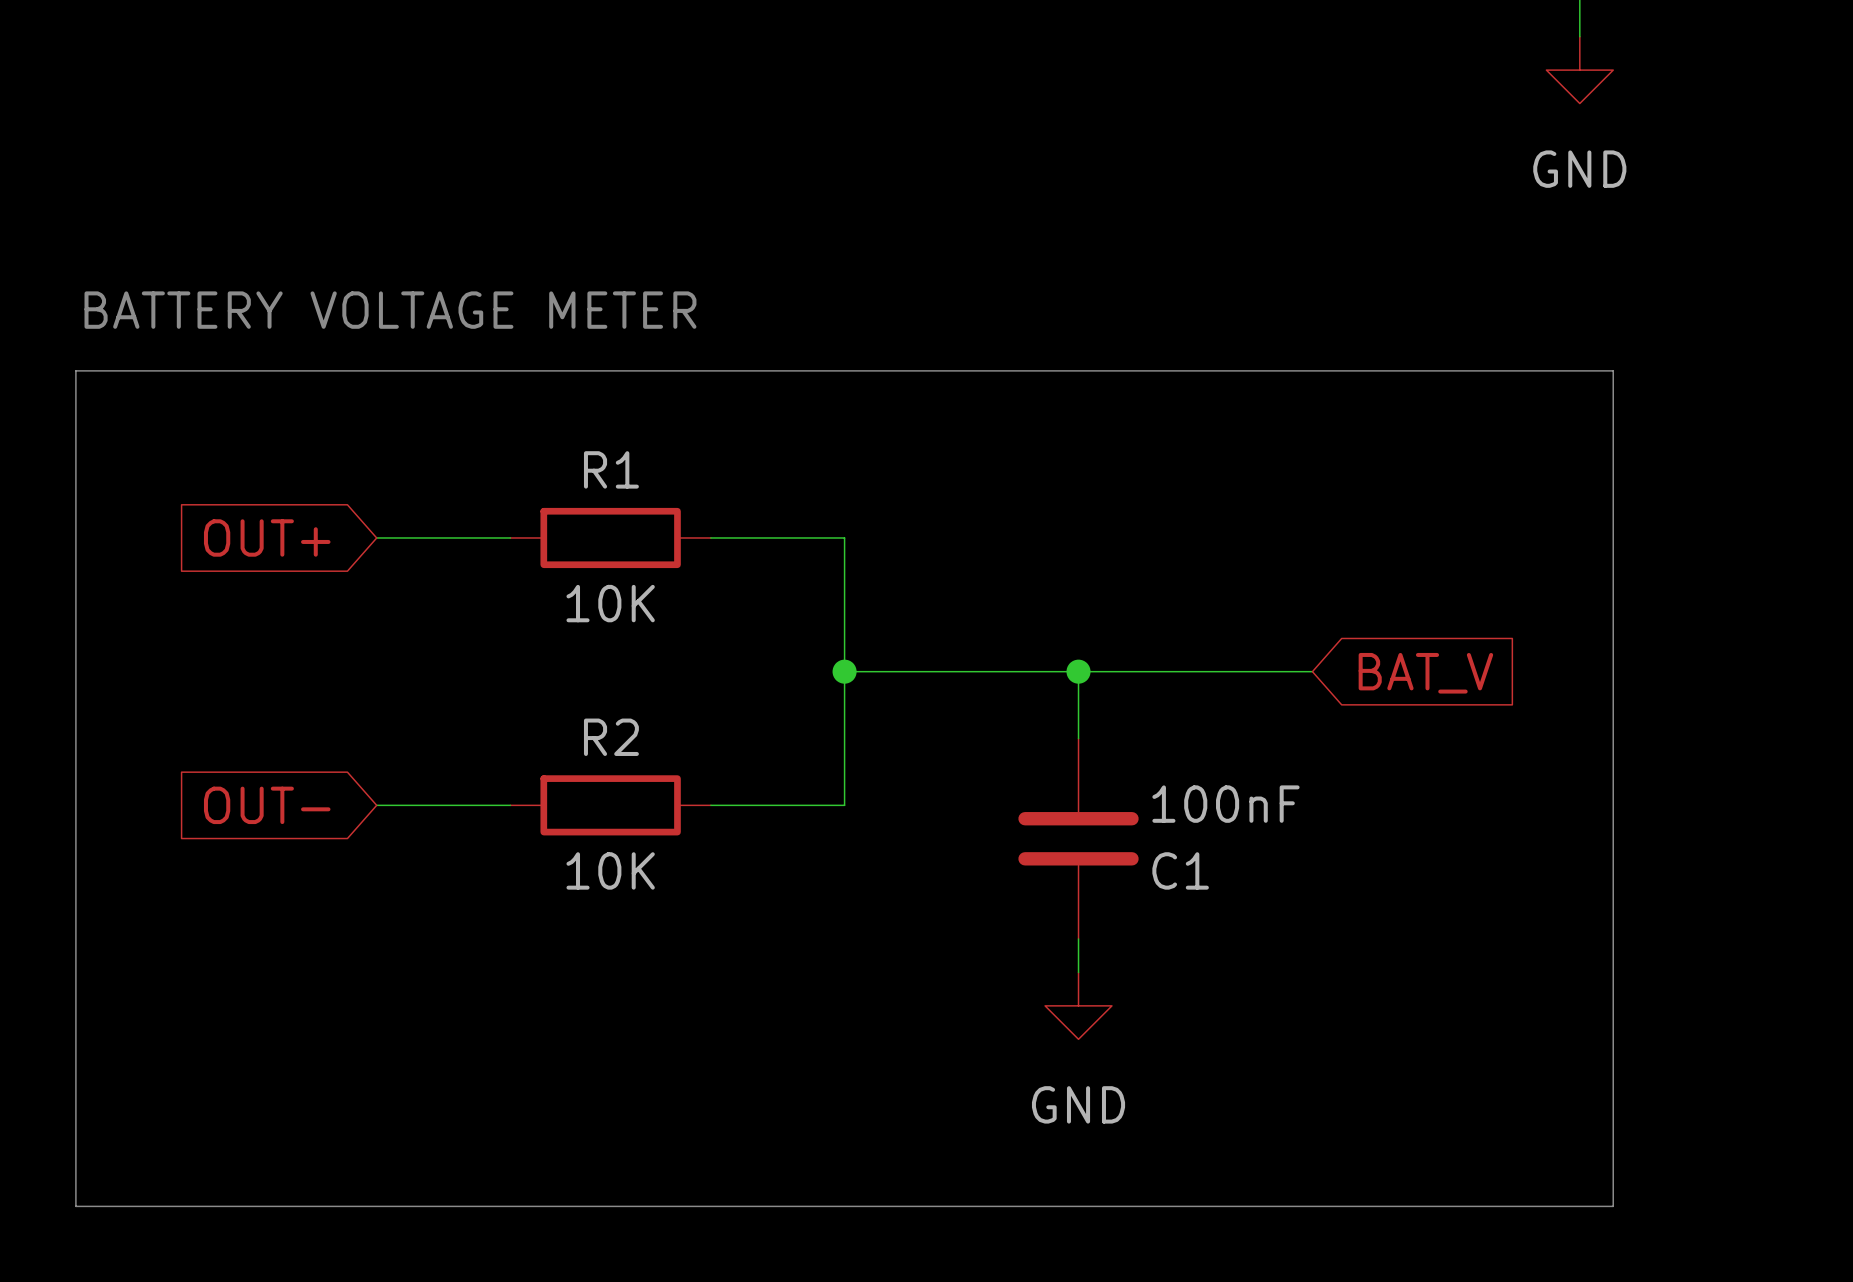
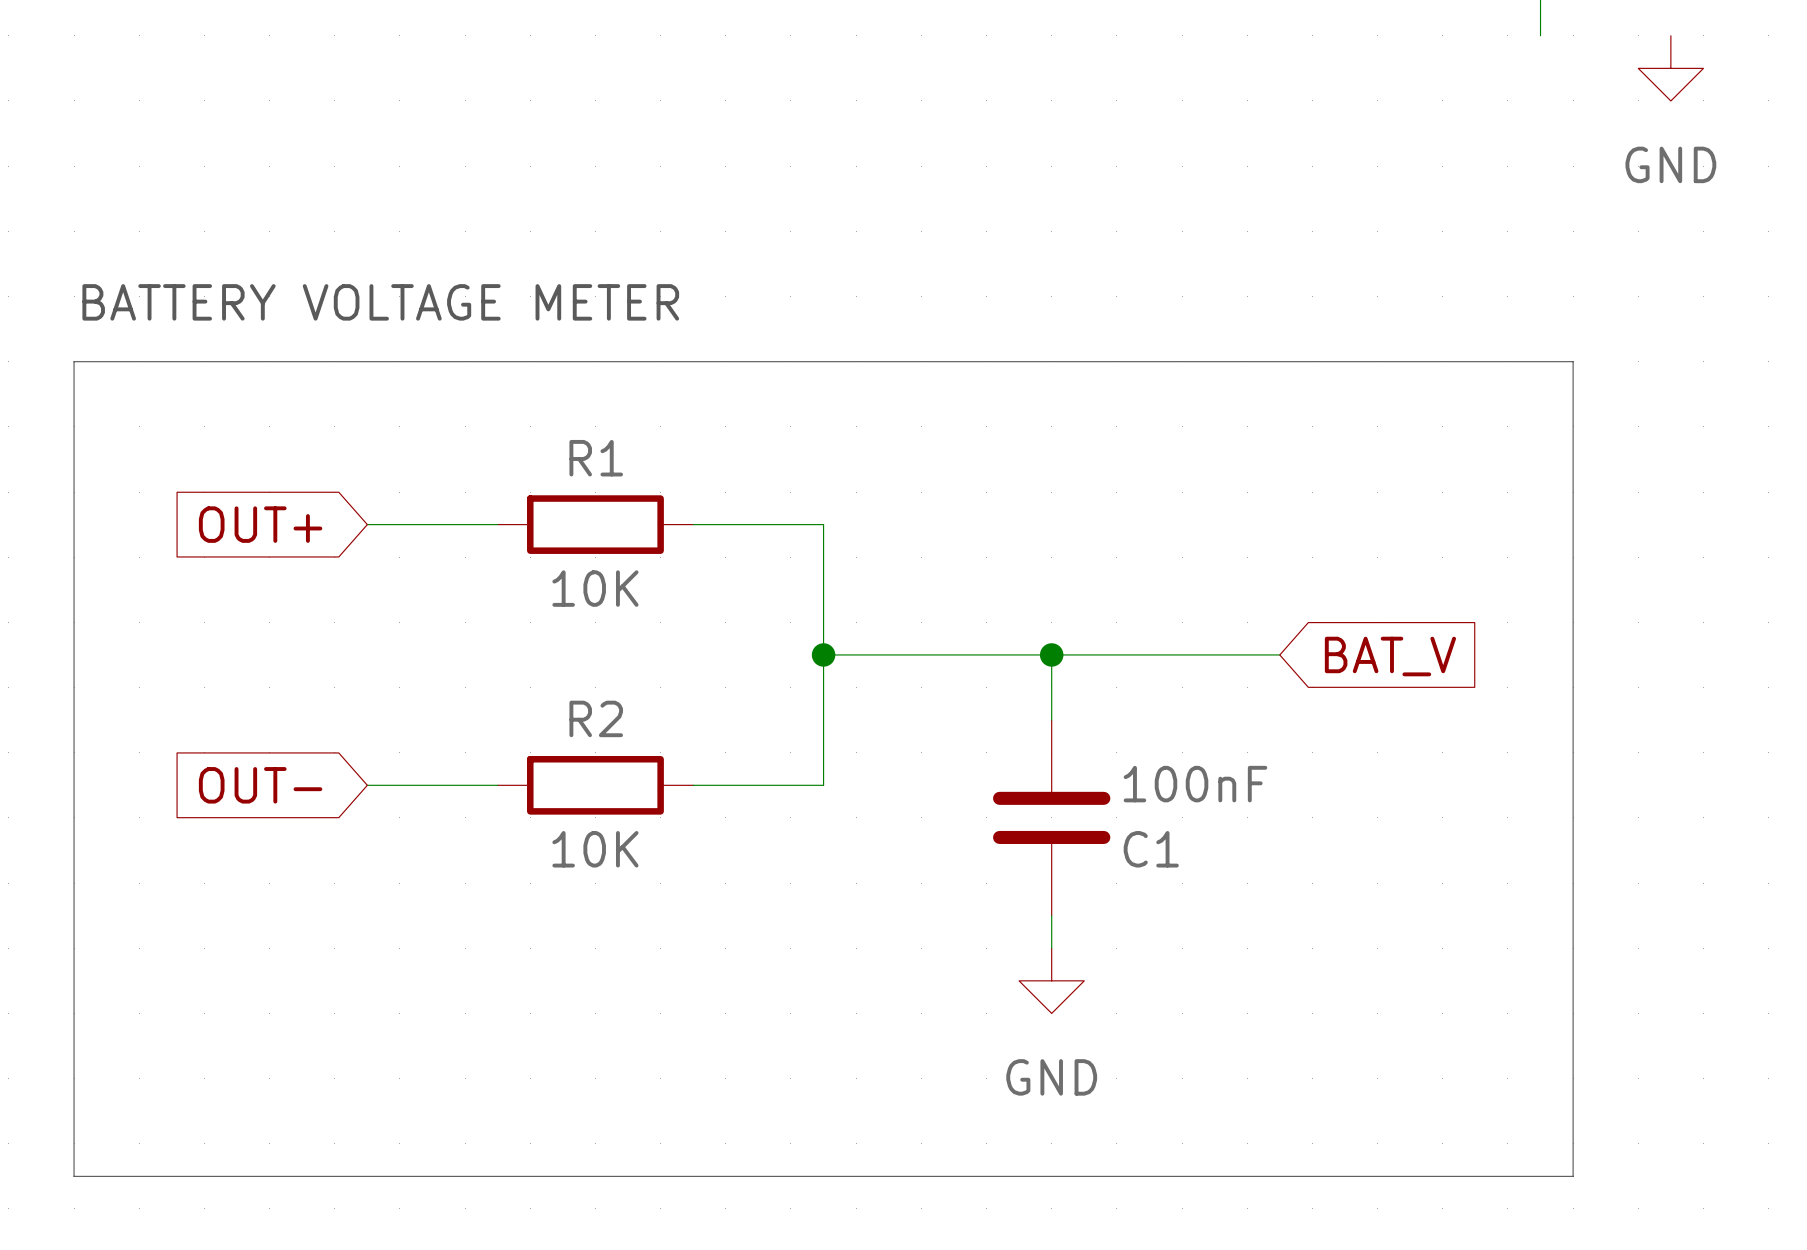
power symbol position: GND (1579, 70) -> GND (1670, 68)

